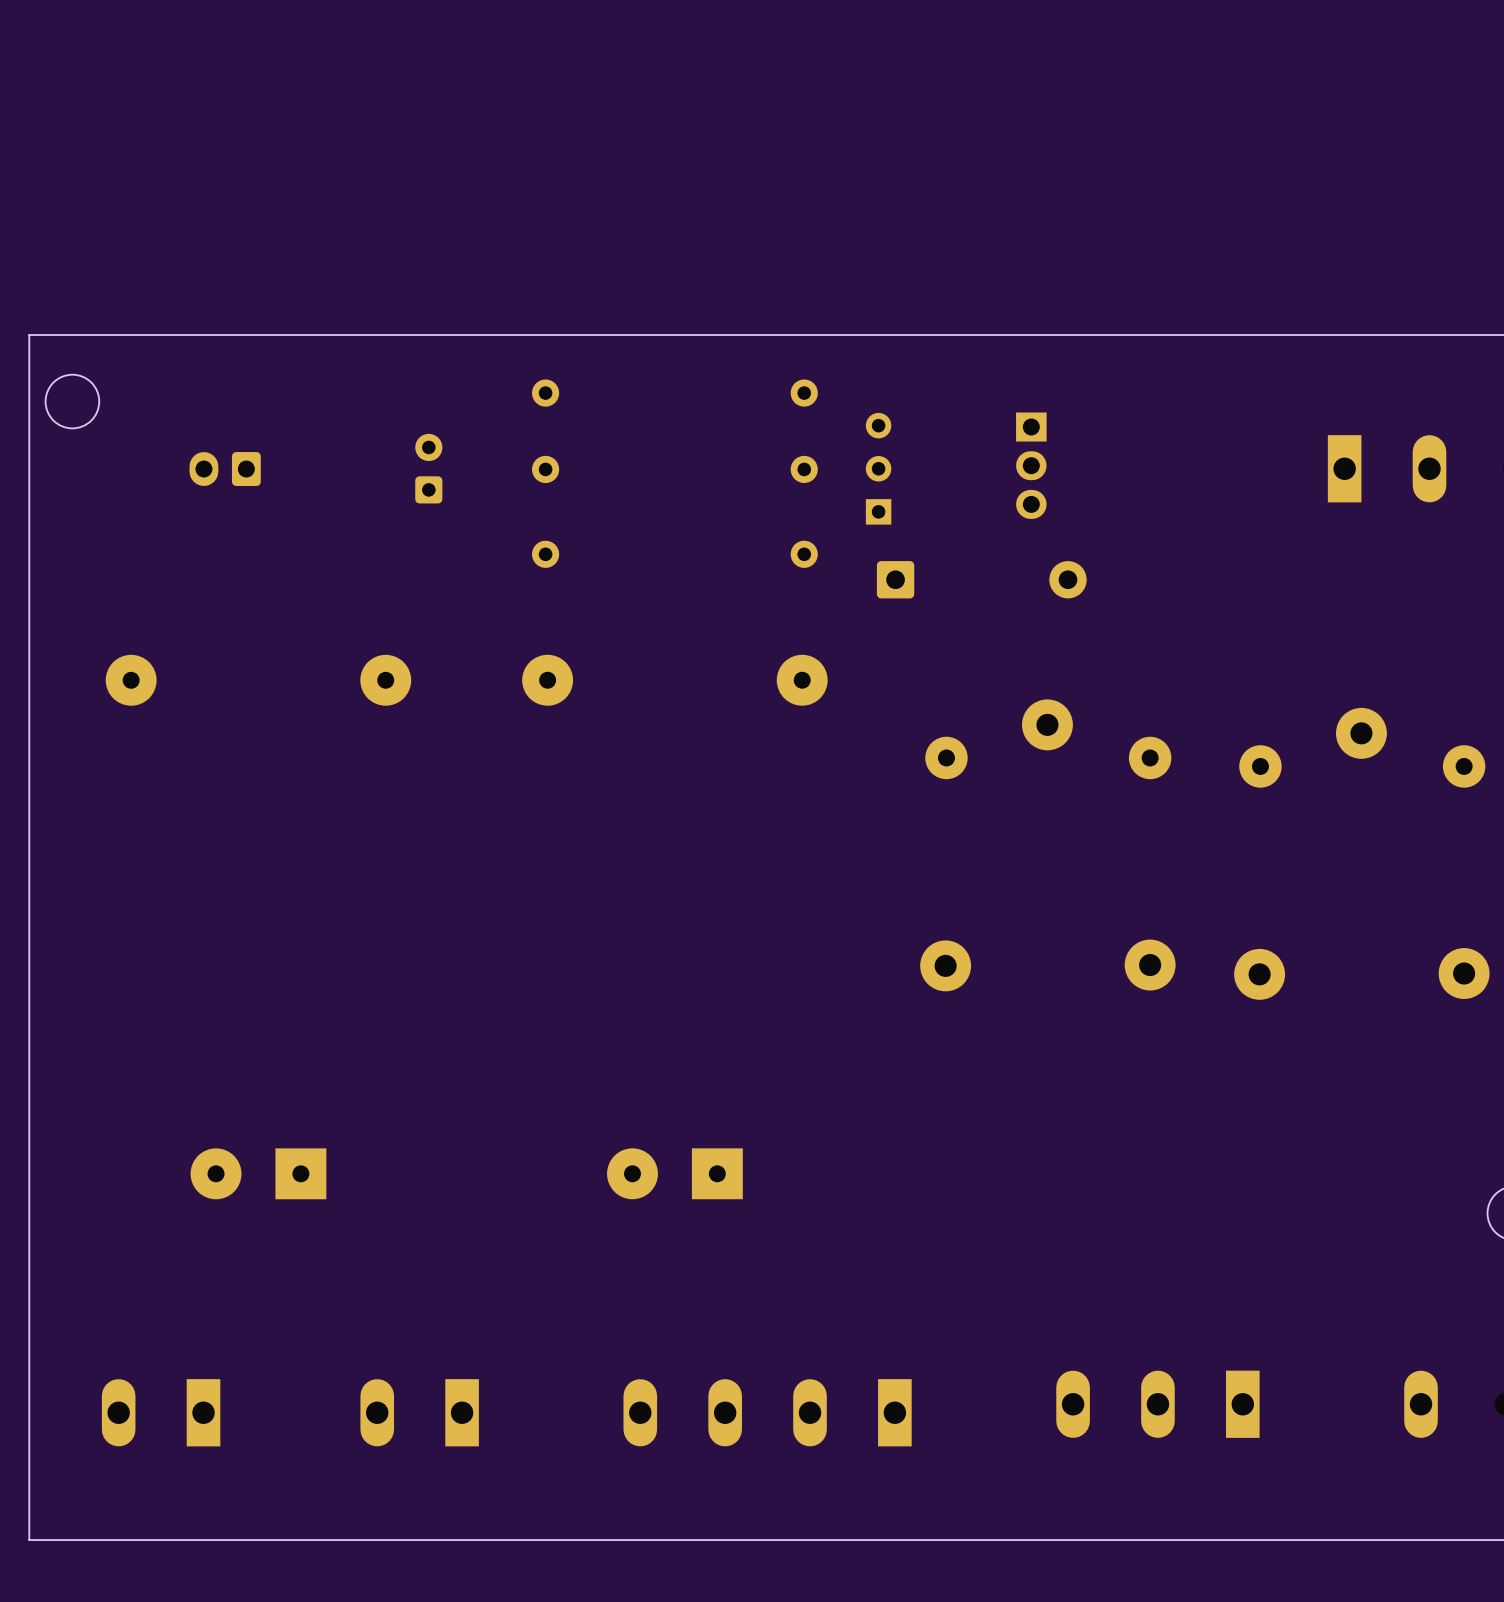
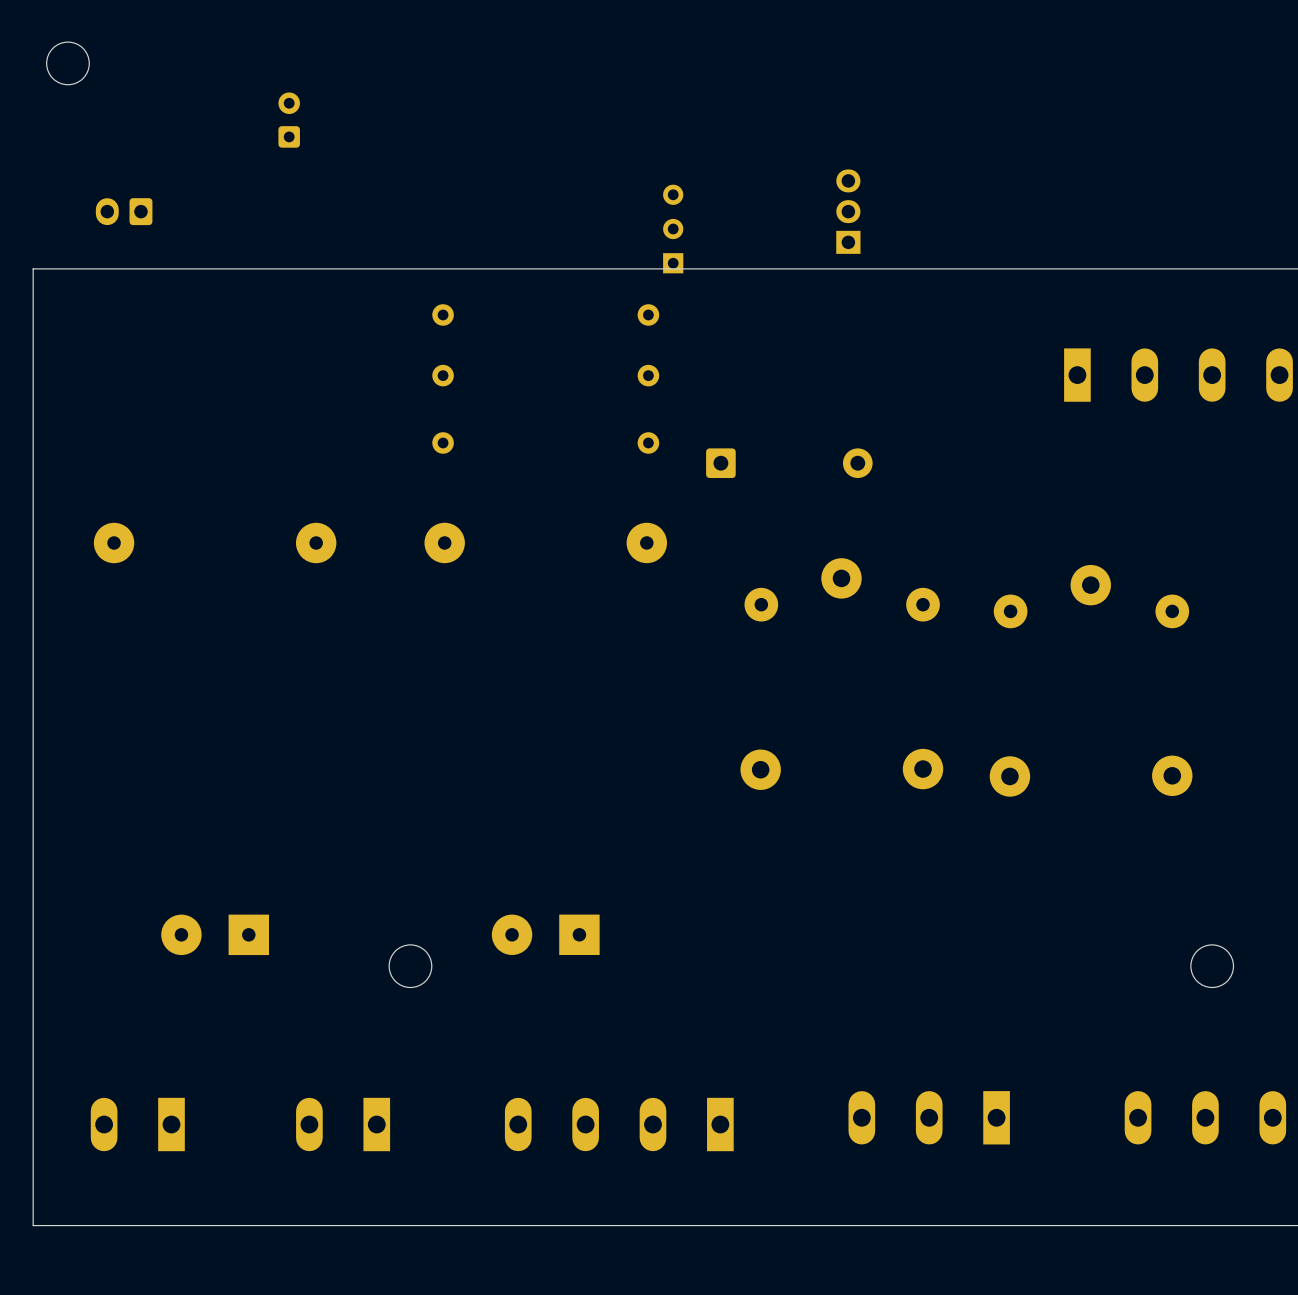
round board edge position: (72, 401) -> (67, 63)
part rotation: 0° (1031, 465) -> 180° (848, 211)
part position: (1031, 465) -> (848, 211)
part position: (428, 468) -> (289, 120)
part position: (878, 468) -> (673, 229)
part position: (225, 469) -> (124, 211)
round board edge: none -> [388, 944, 433, 988]

